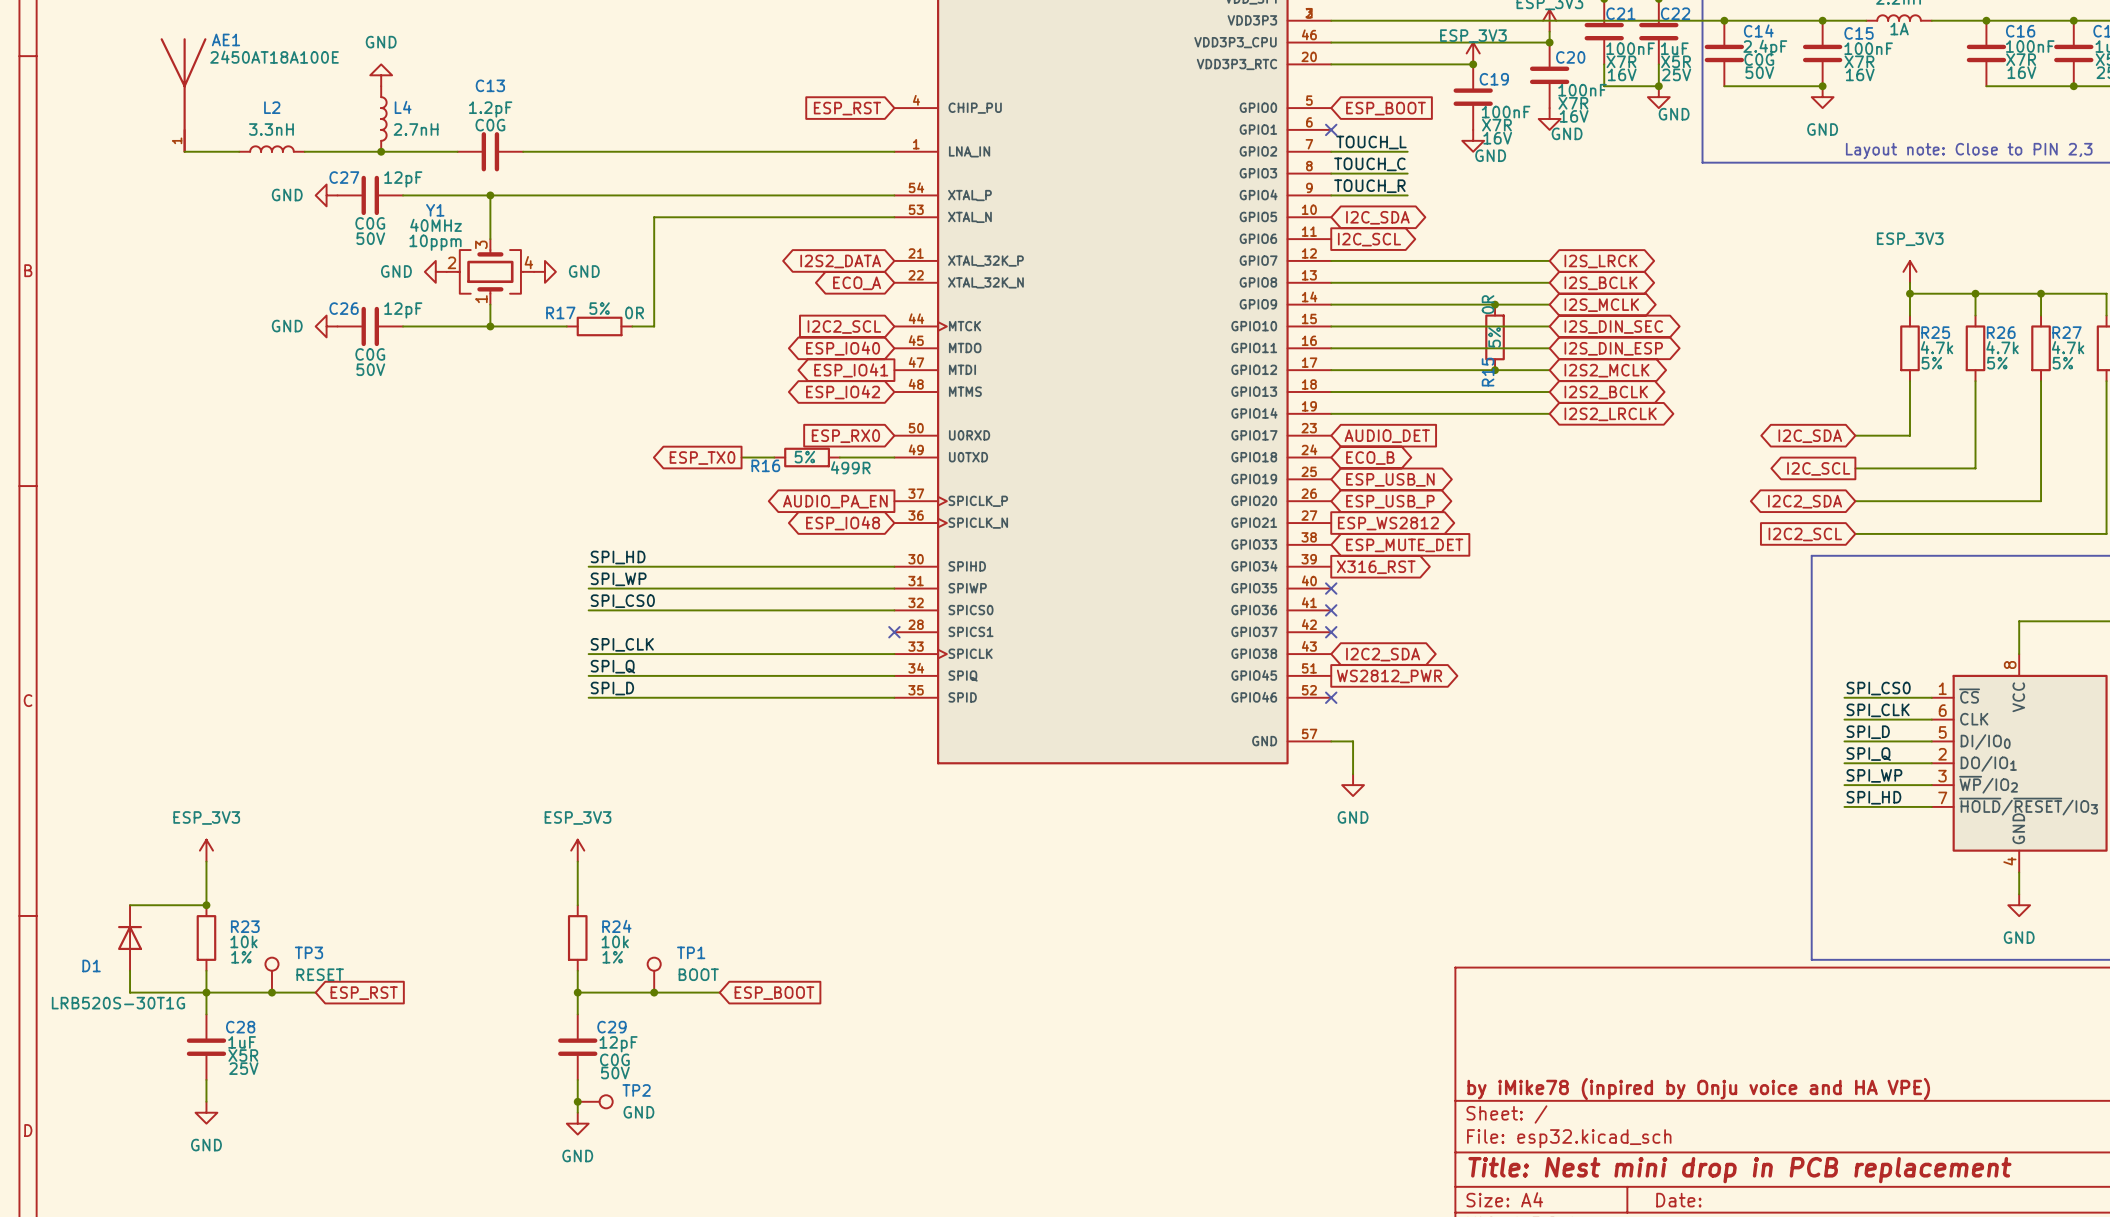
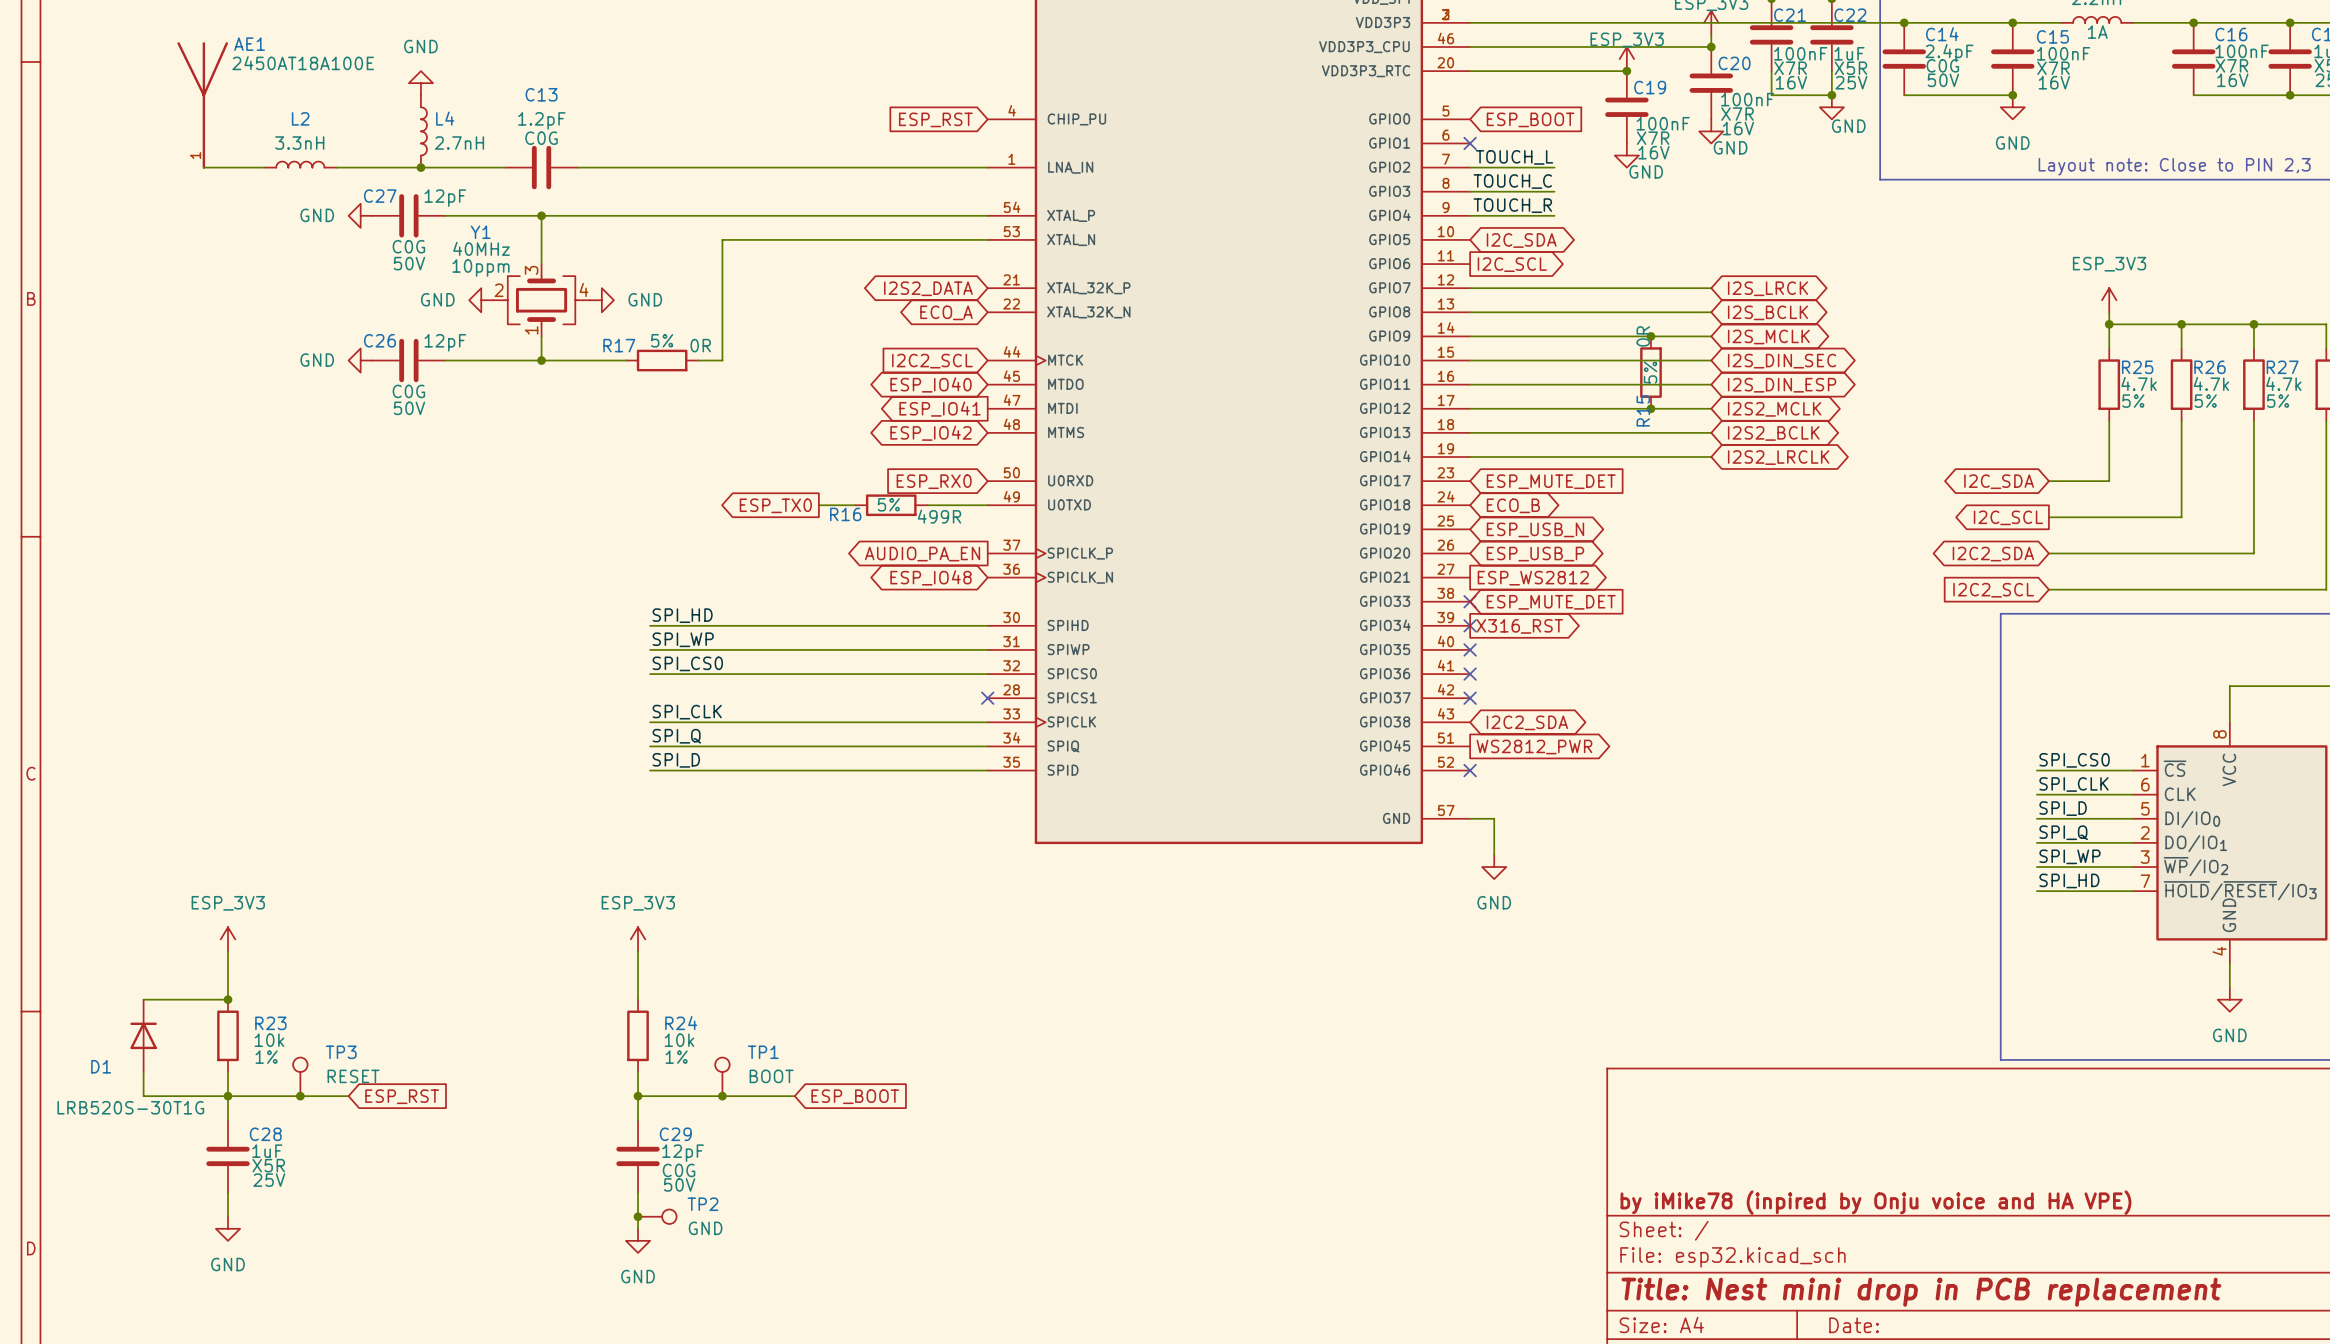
global label: AUDIO_DET (1387, 436) -> ESP_MUTE_DET (1551, 481)
no-connect mark: none -> (1470, 601)
no-connect mark: none -> (1470, 625)

